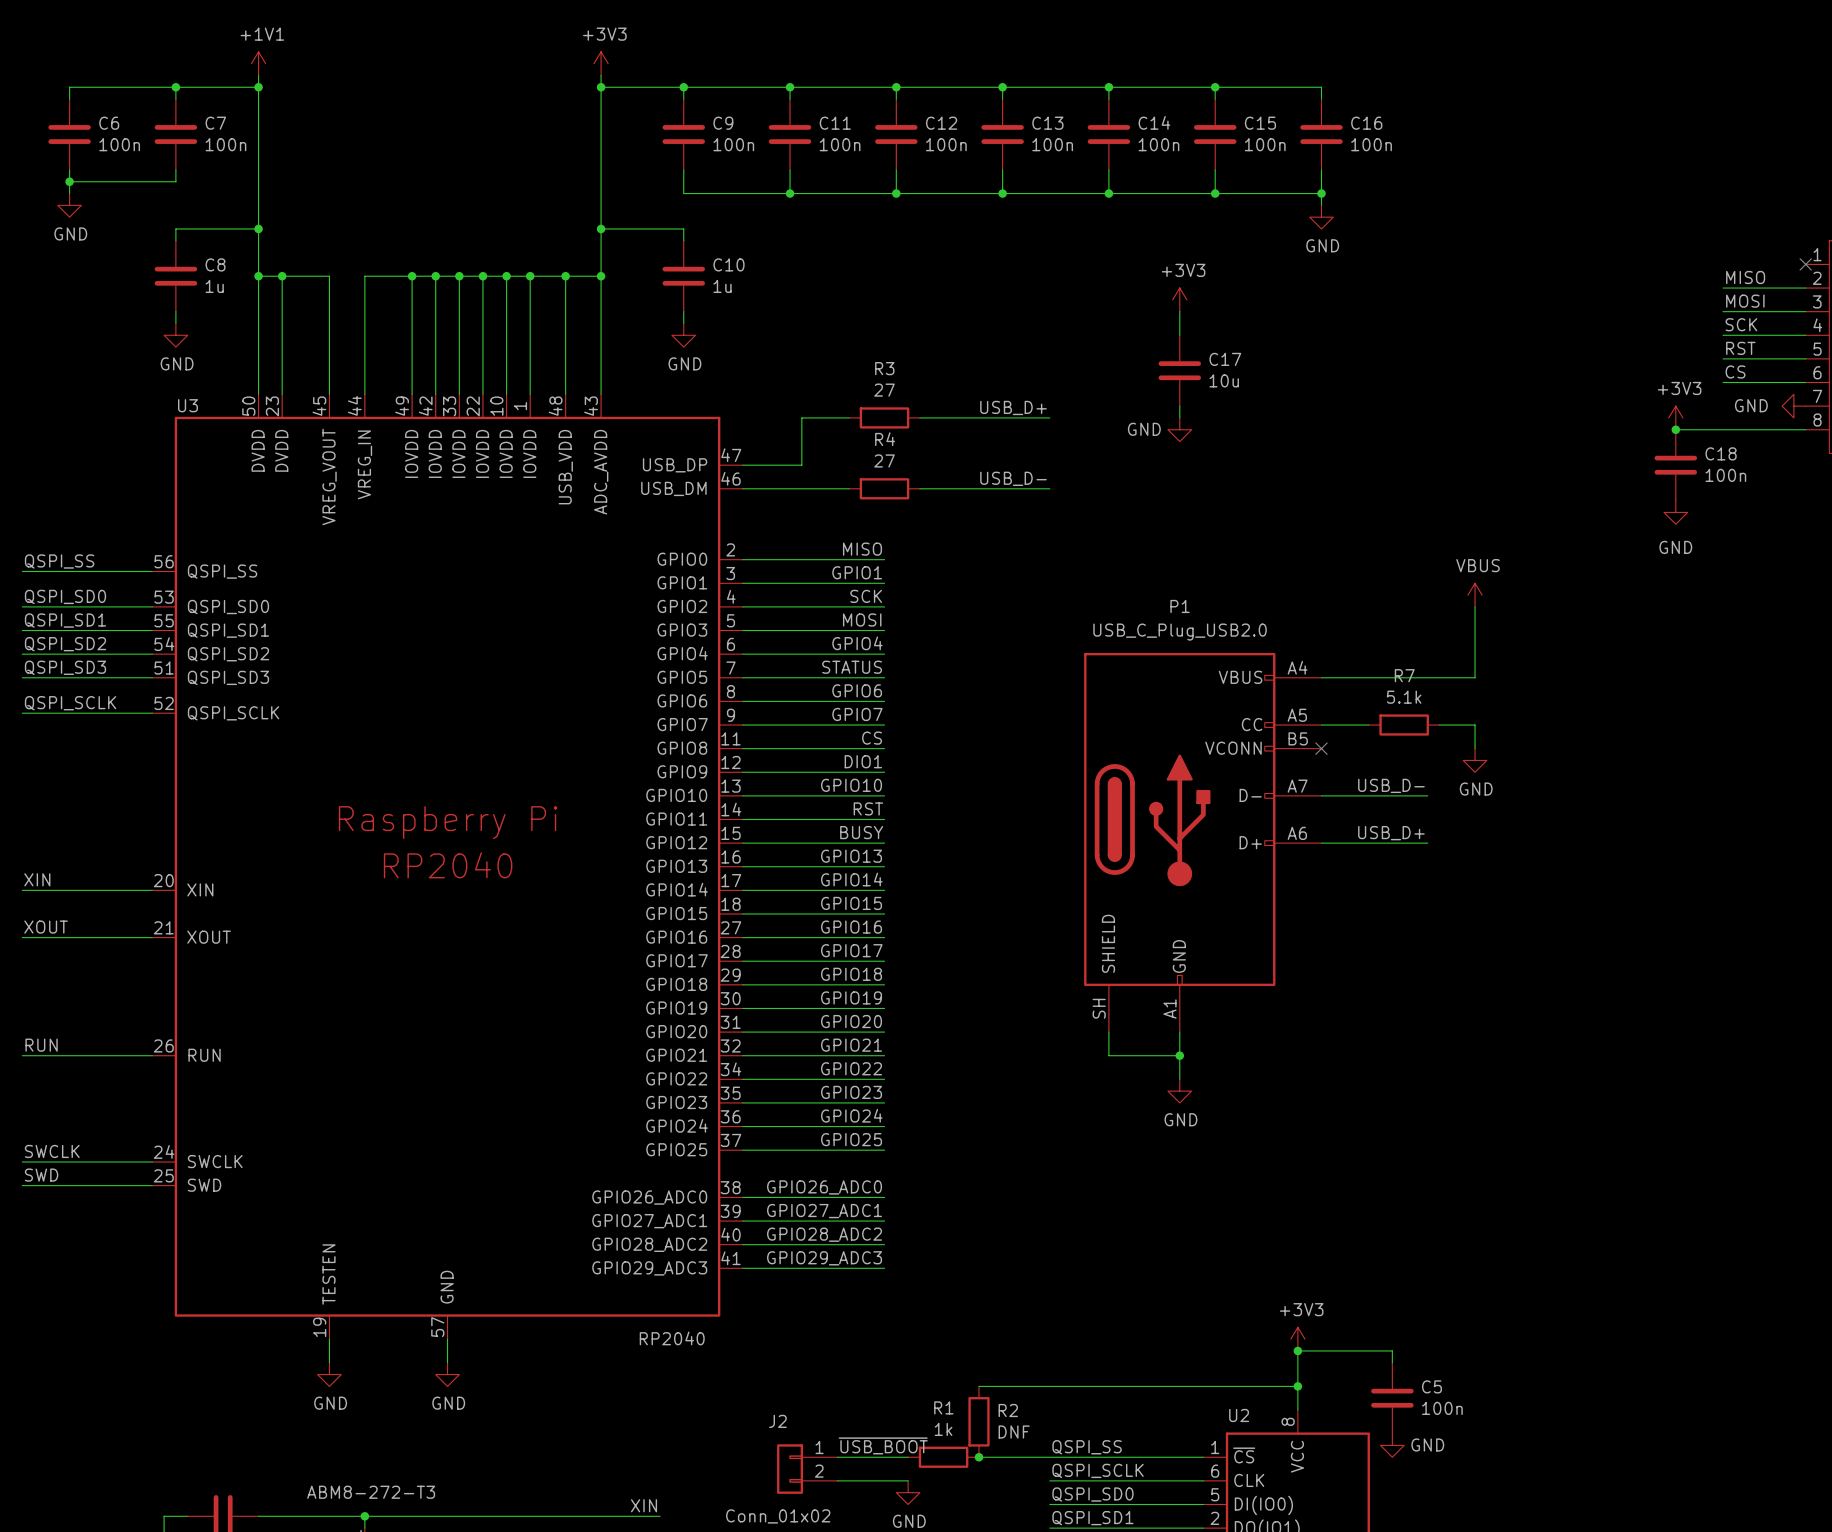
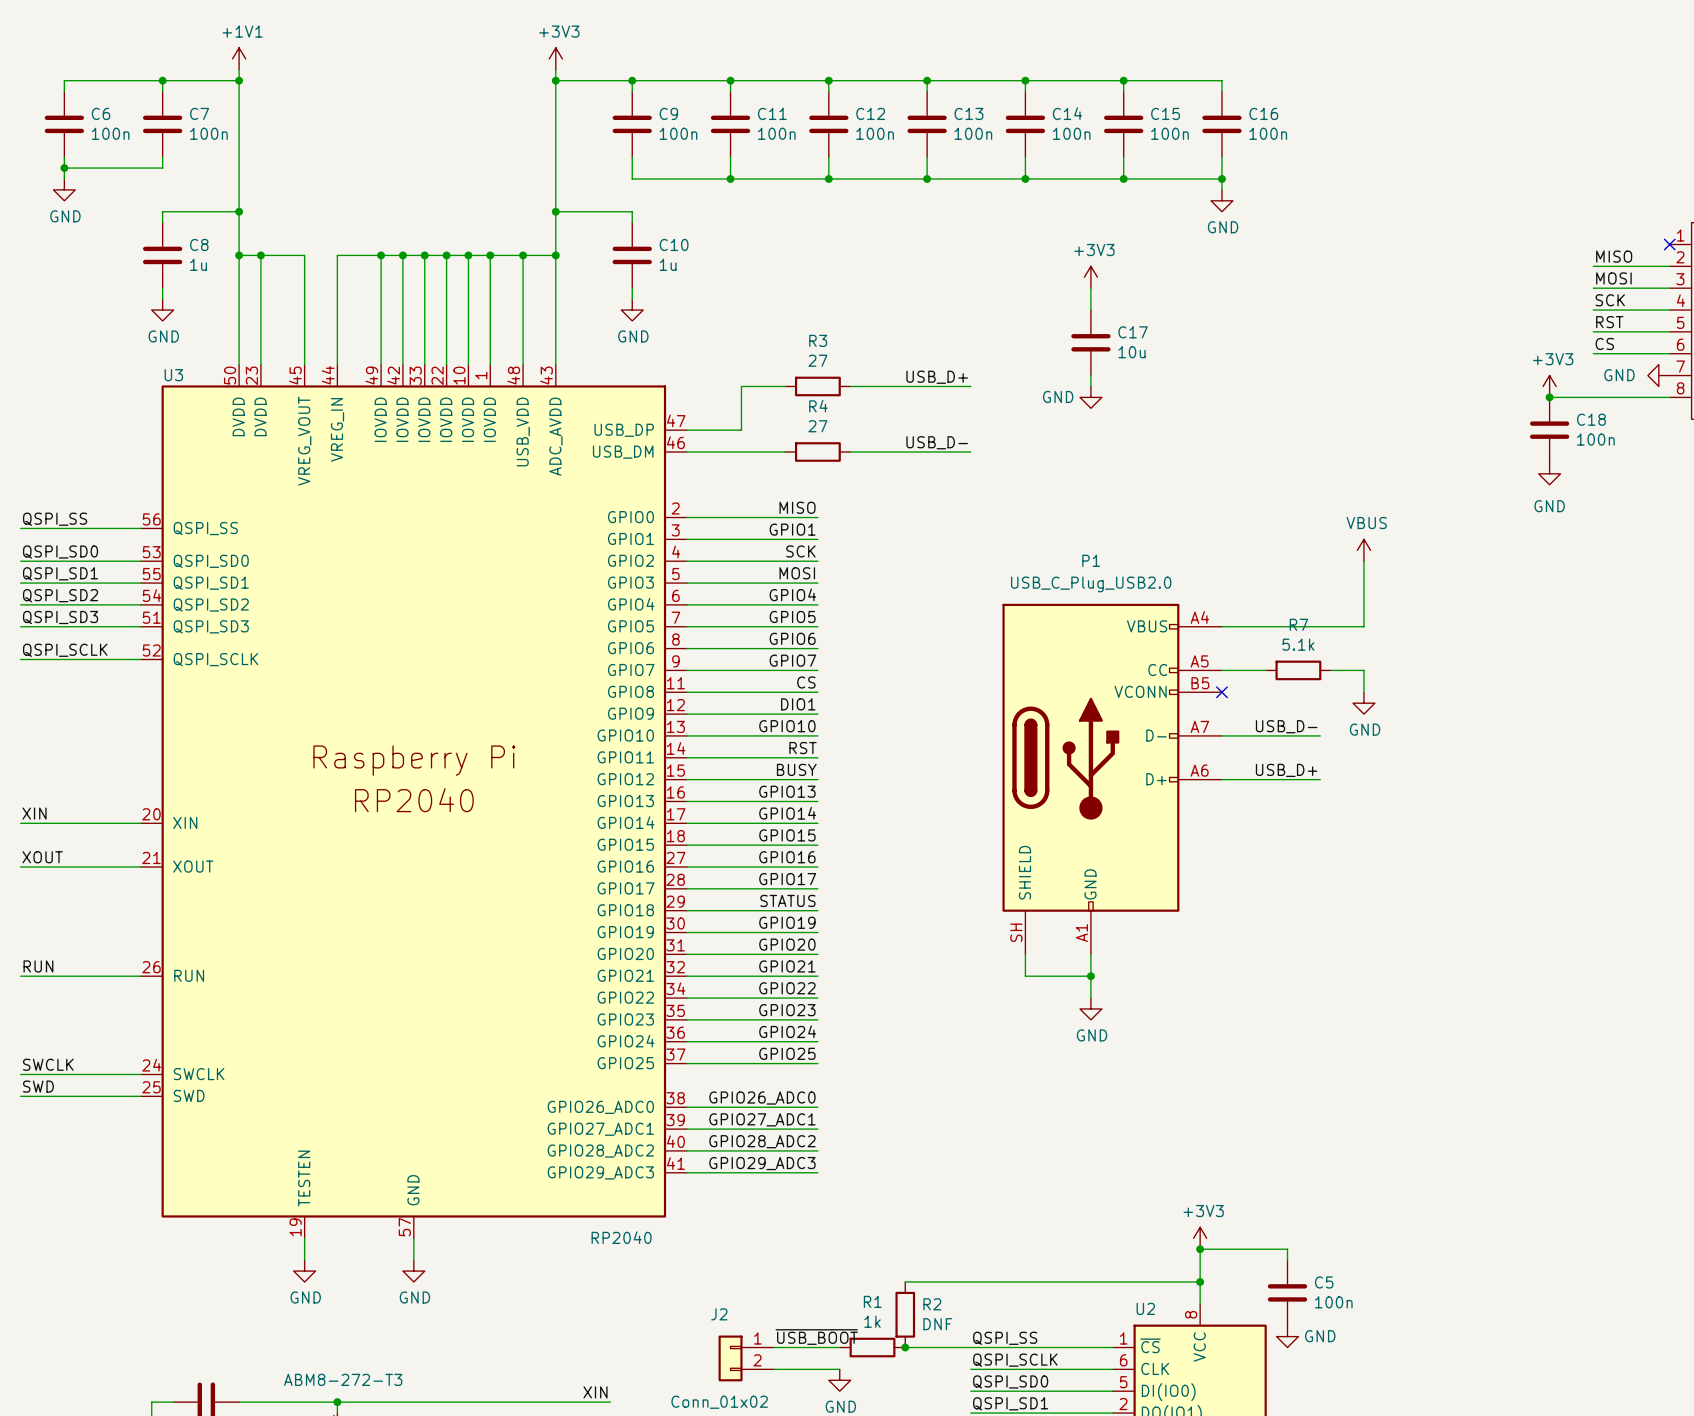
label: STATUS (852, 667) -> GPIO5 (792, 616)
label: GPIO18 (851, 974) -> STATUS (787, 900)

